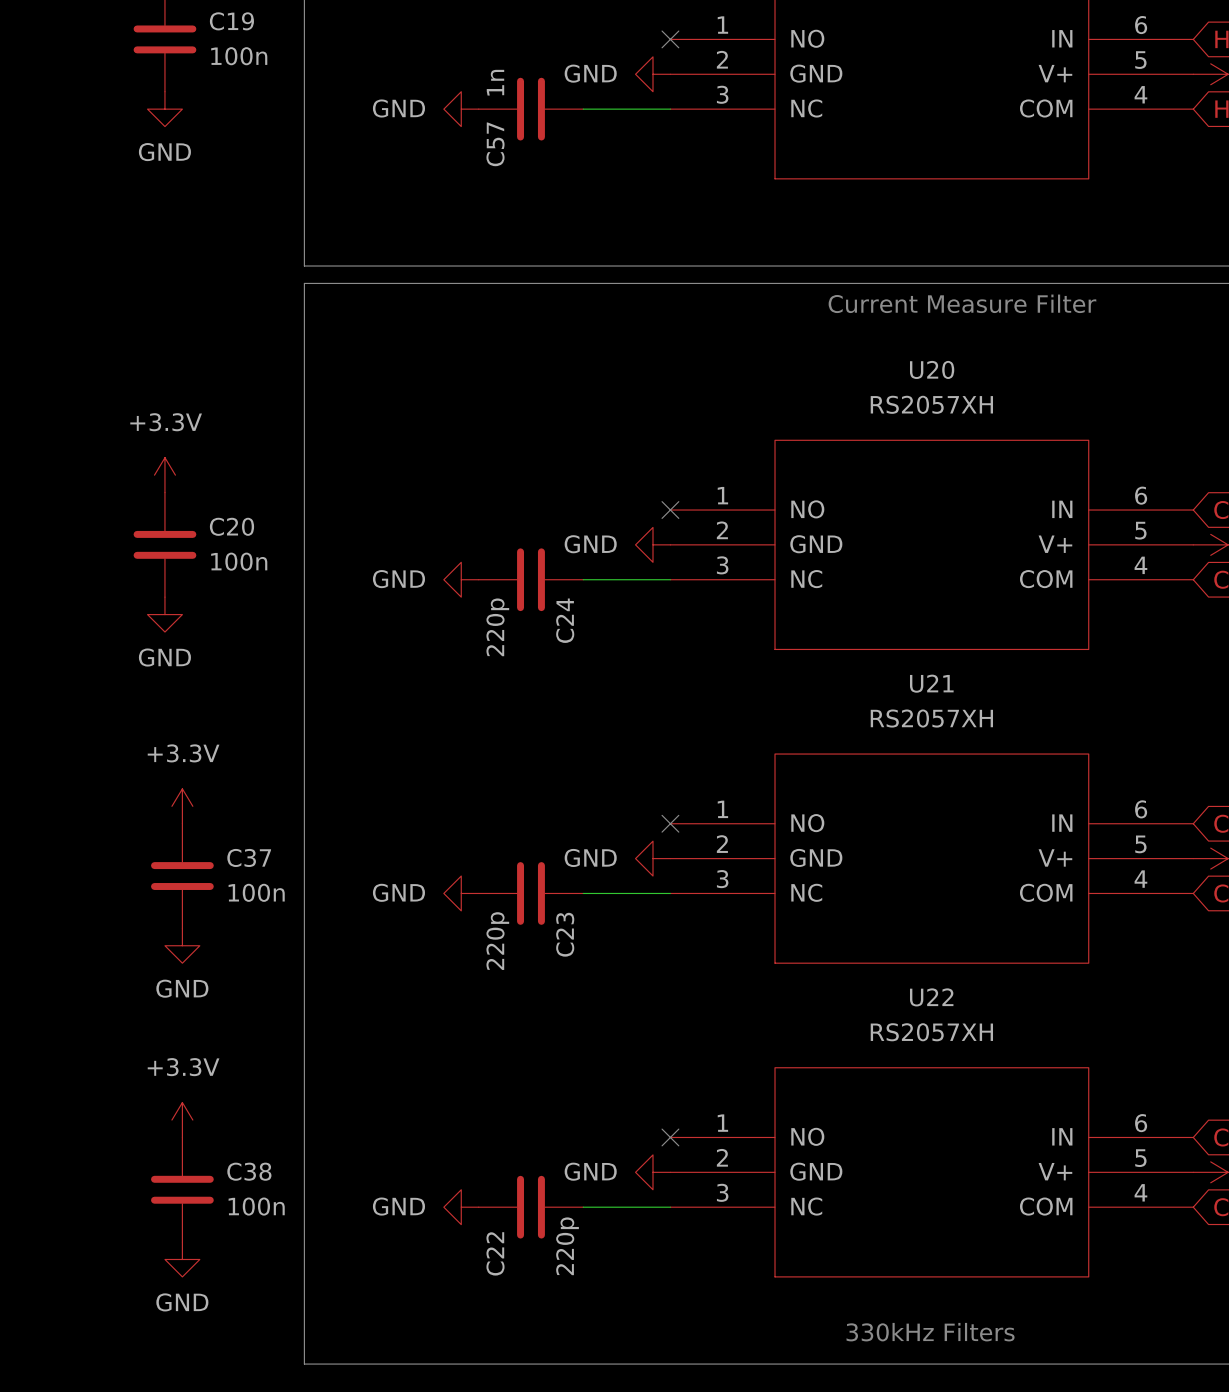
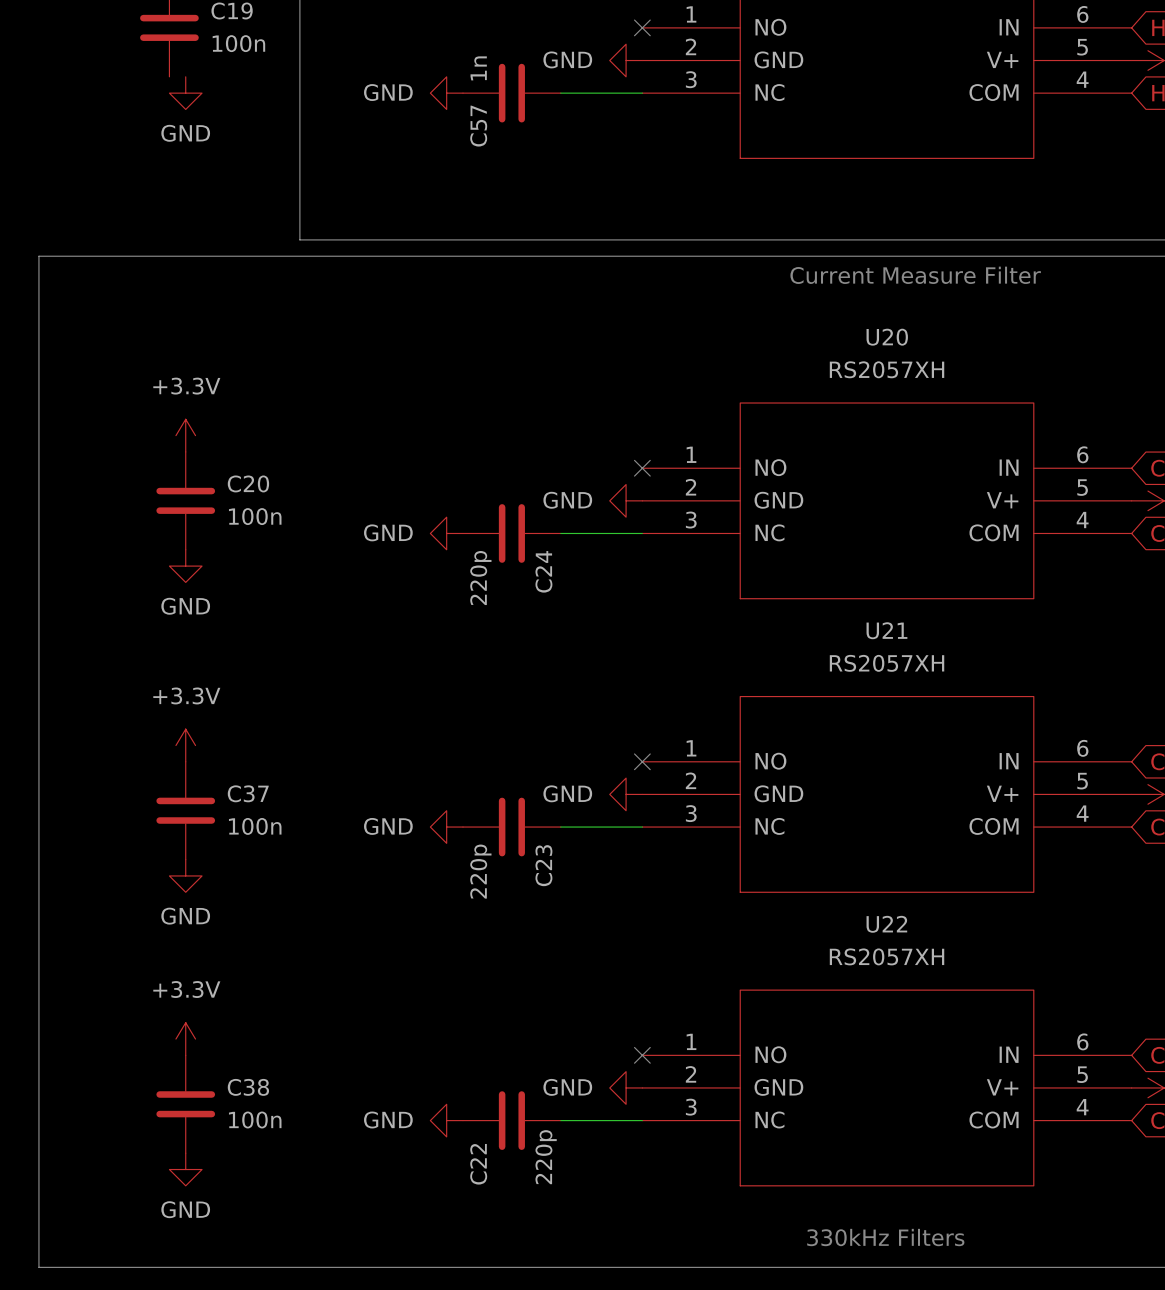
power symbol position: GND (164, 109) -> GND (185, 93)
line: (304, 283) (304, 1364) -> (299, 256) (38, 256) (38, 1267) (299, 1267)
power symbol position: +3.3V (164, 475) -> +3.3V (185, 435)
C20 position: (164, 544) -> (185, 500)
power symbol position: GND (164, 614) -> GND (185, 566)

